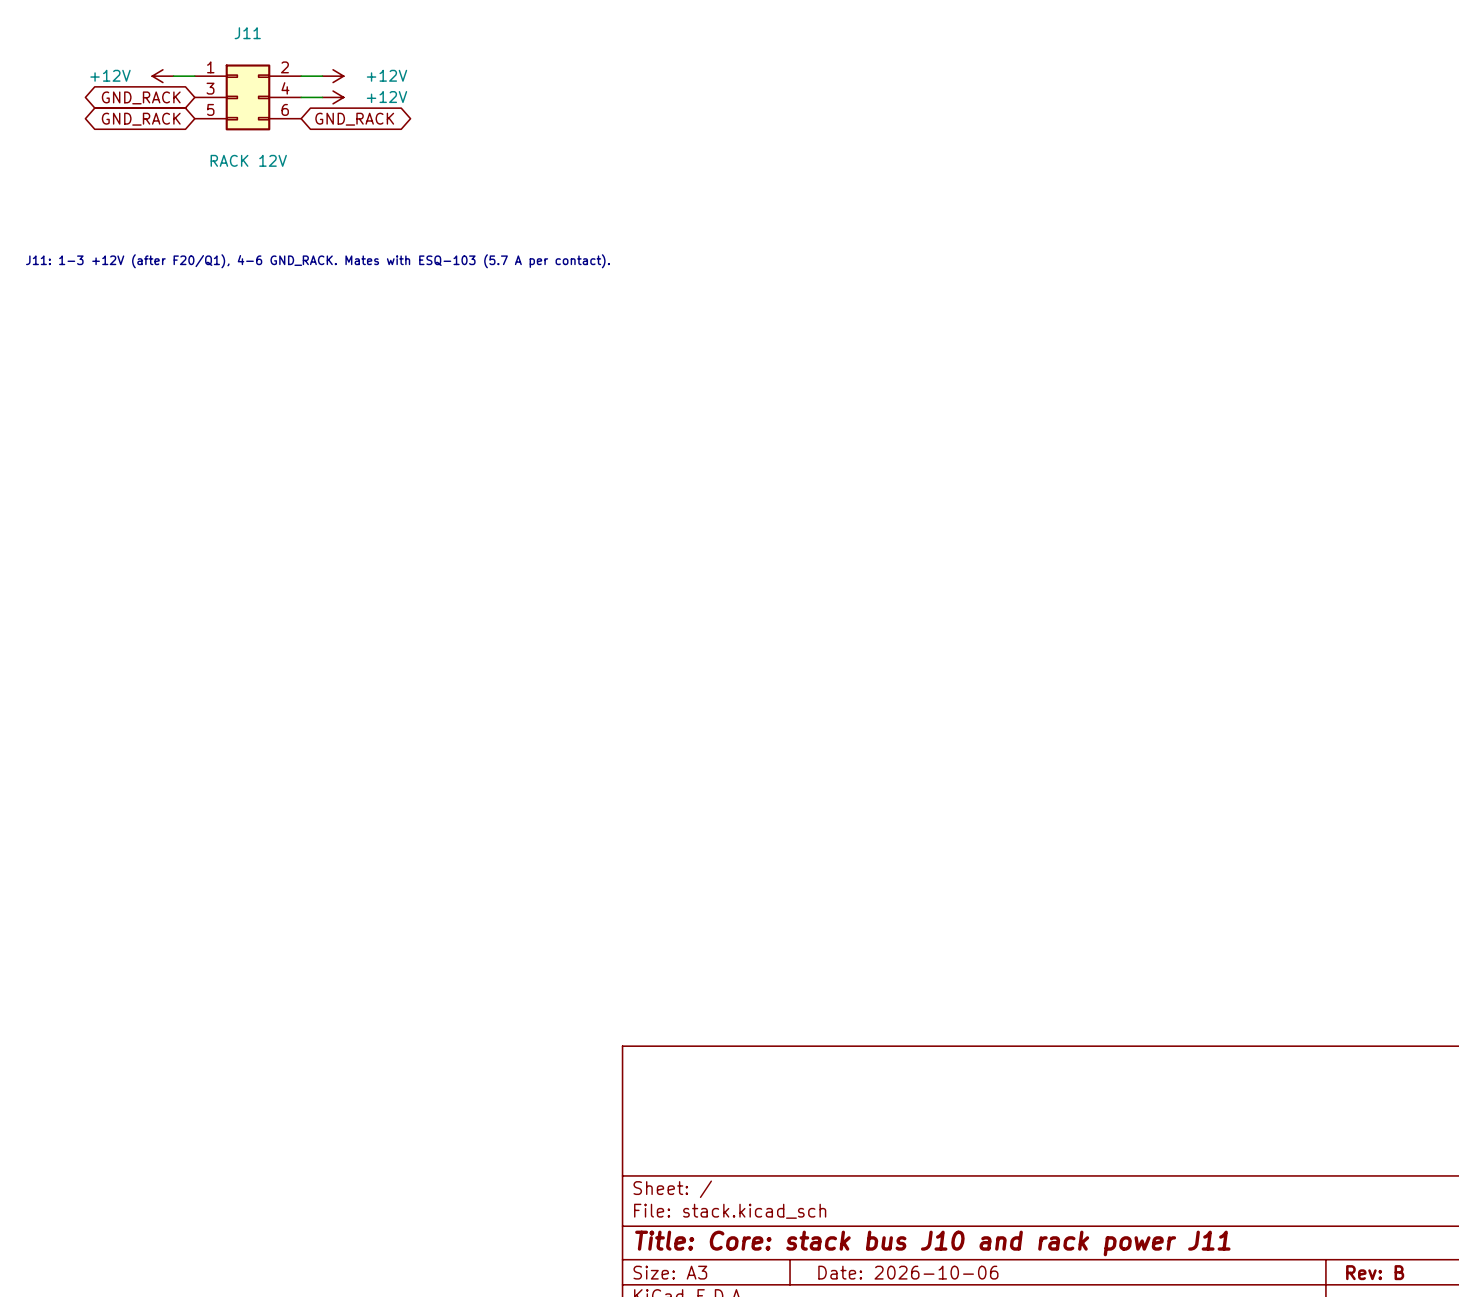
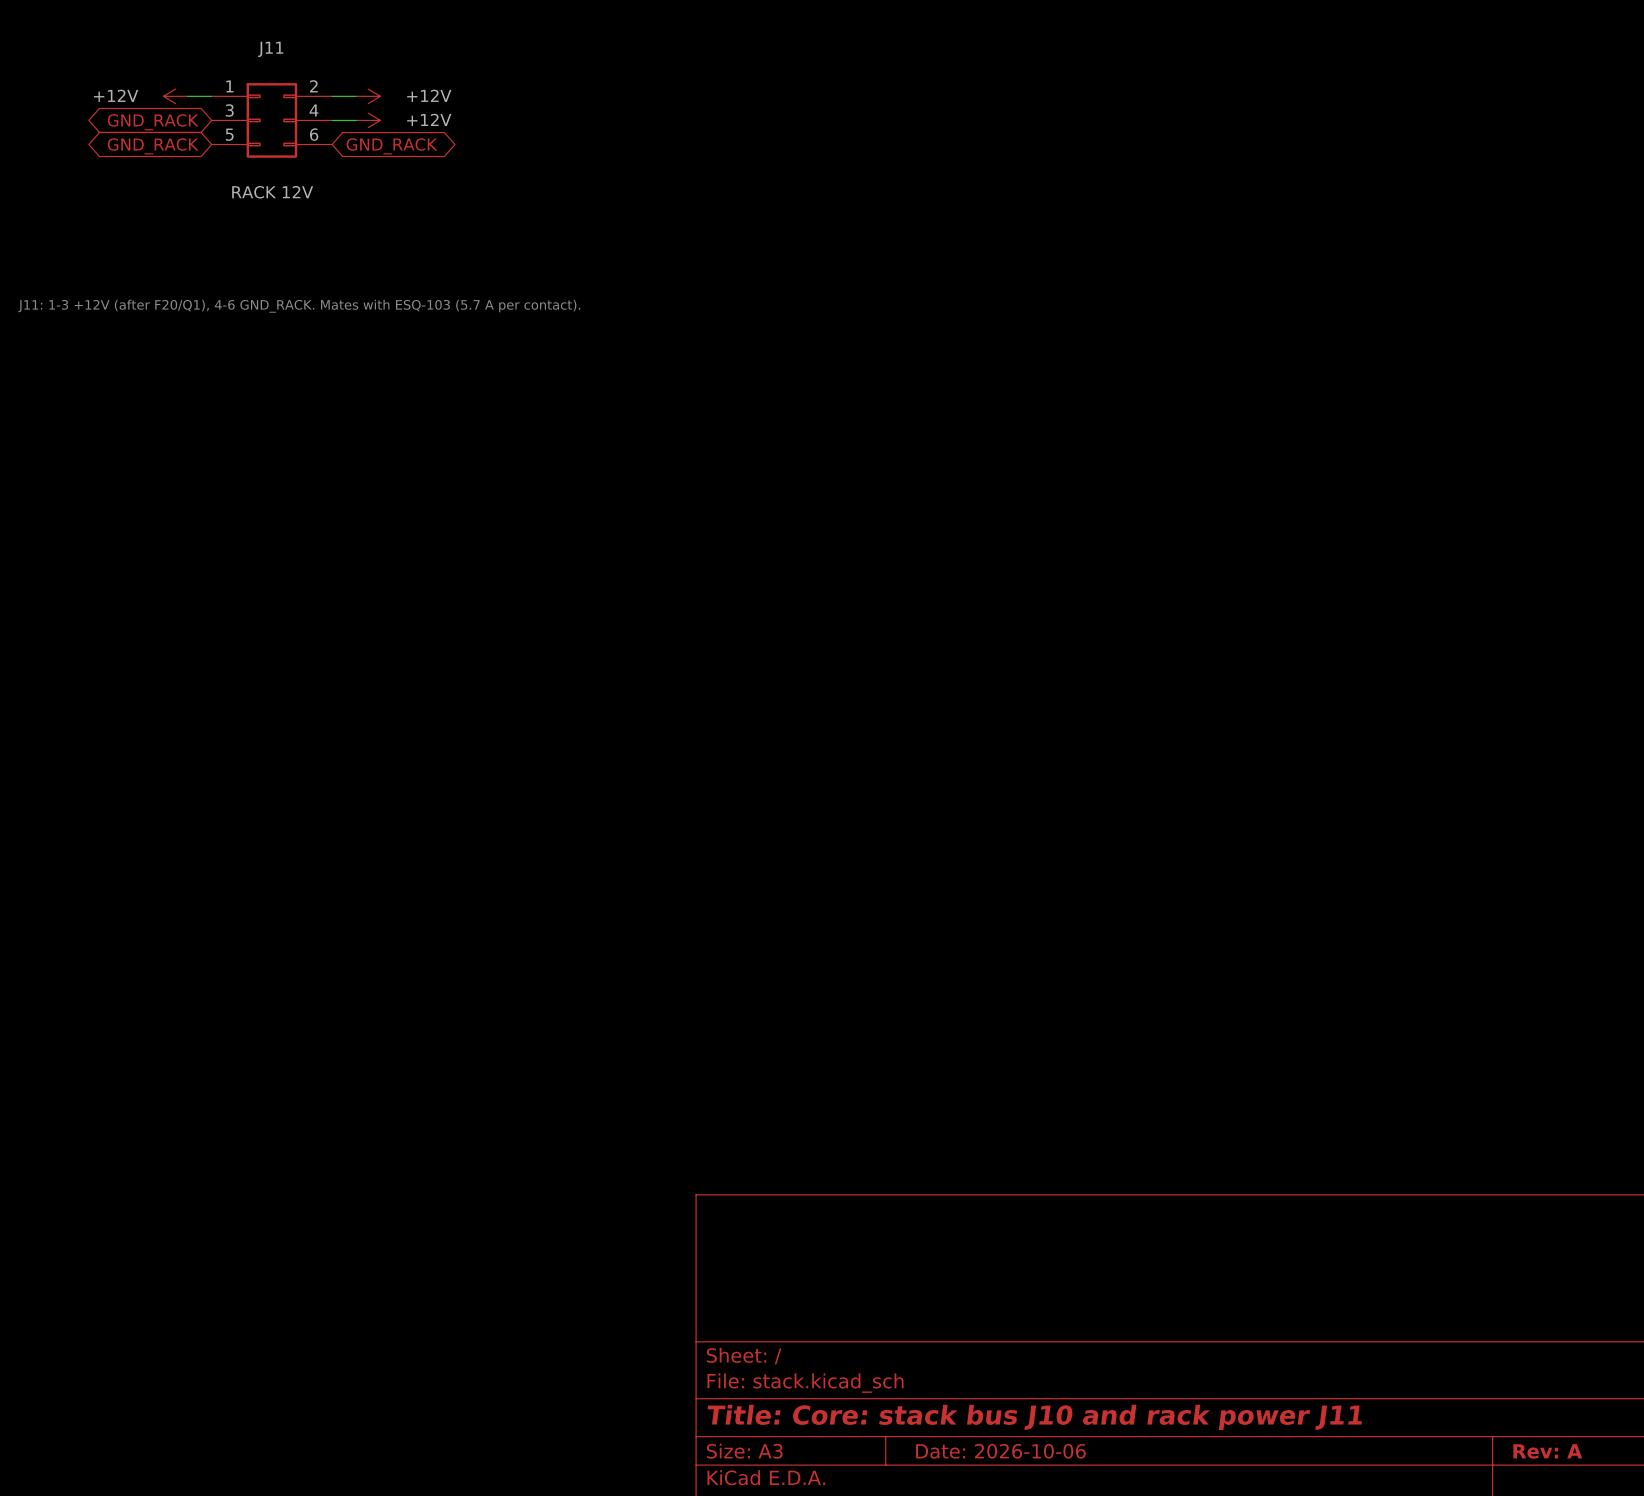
title block: Rev: B (1375, 1272) -> Rev: A (1547, 1451)

